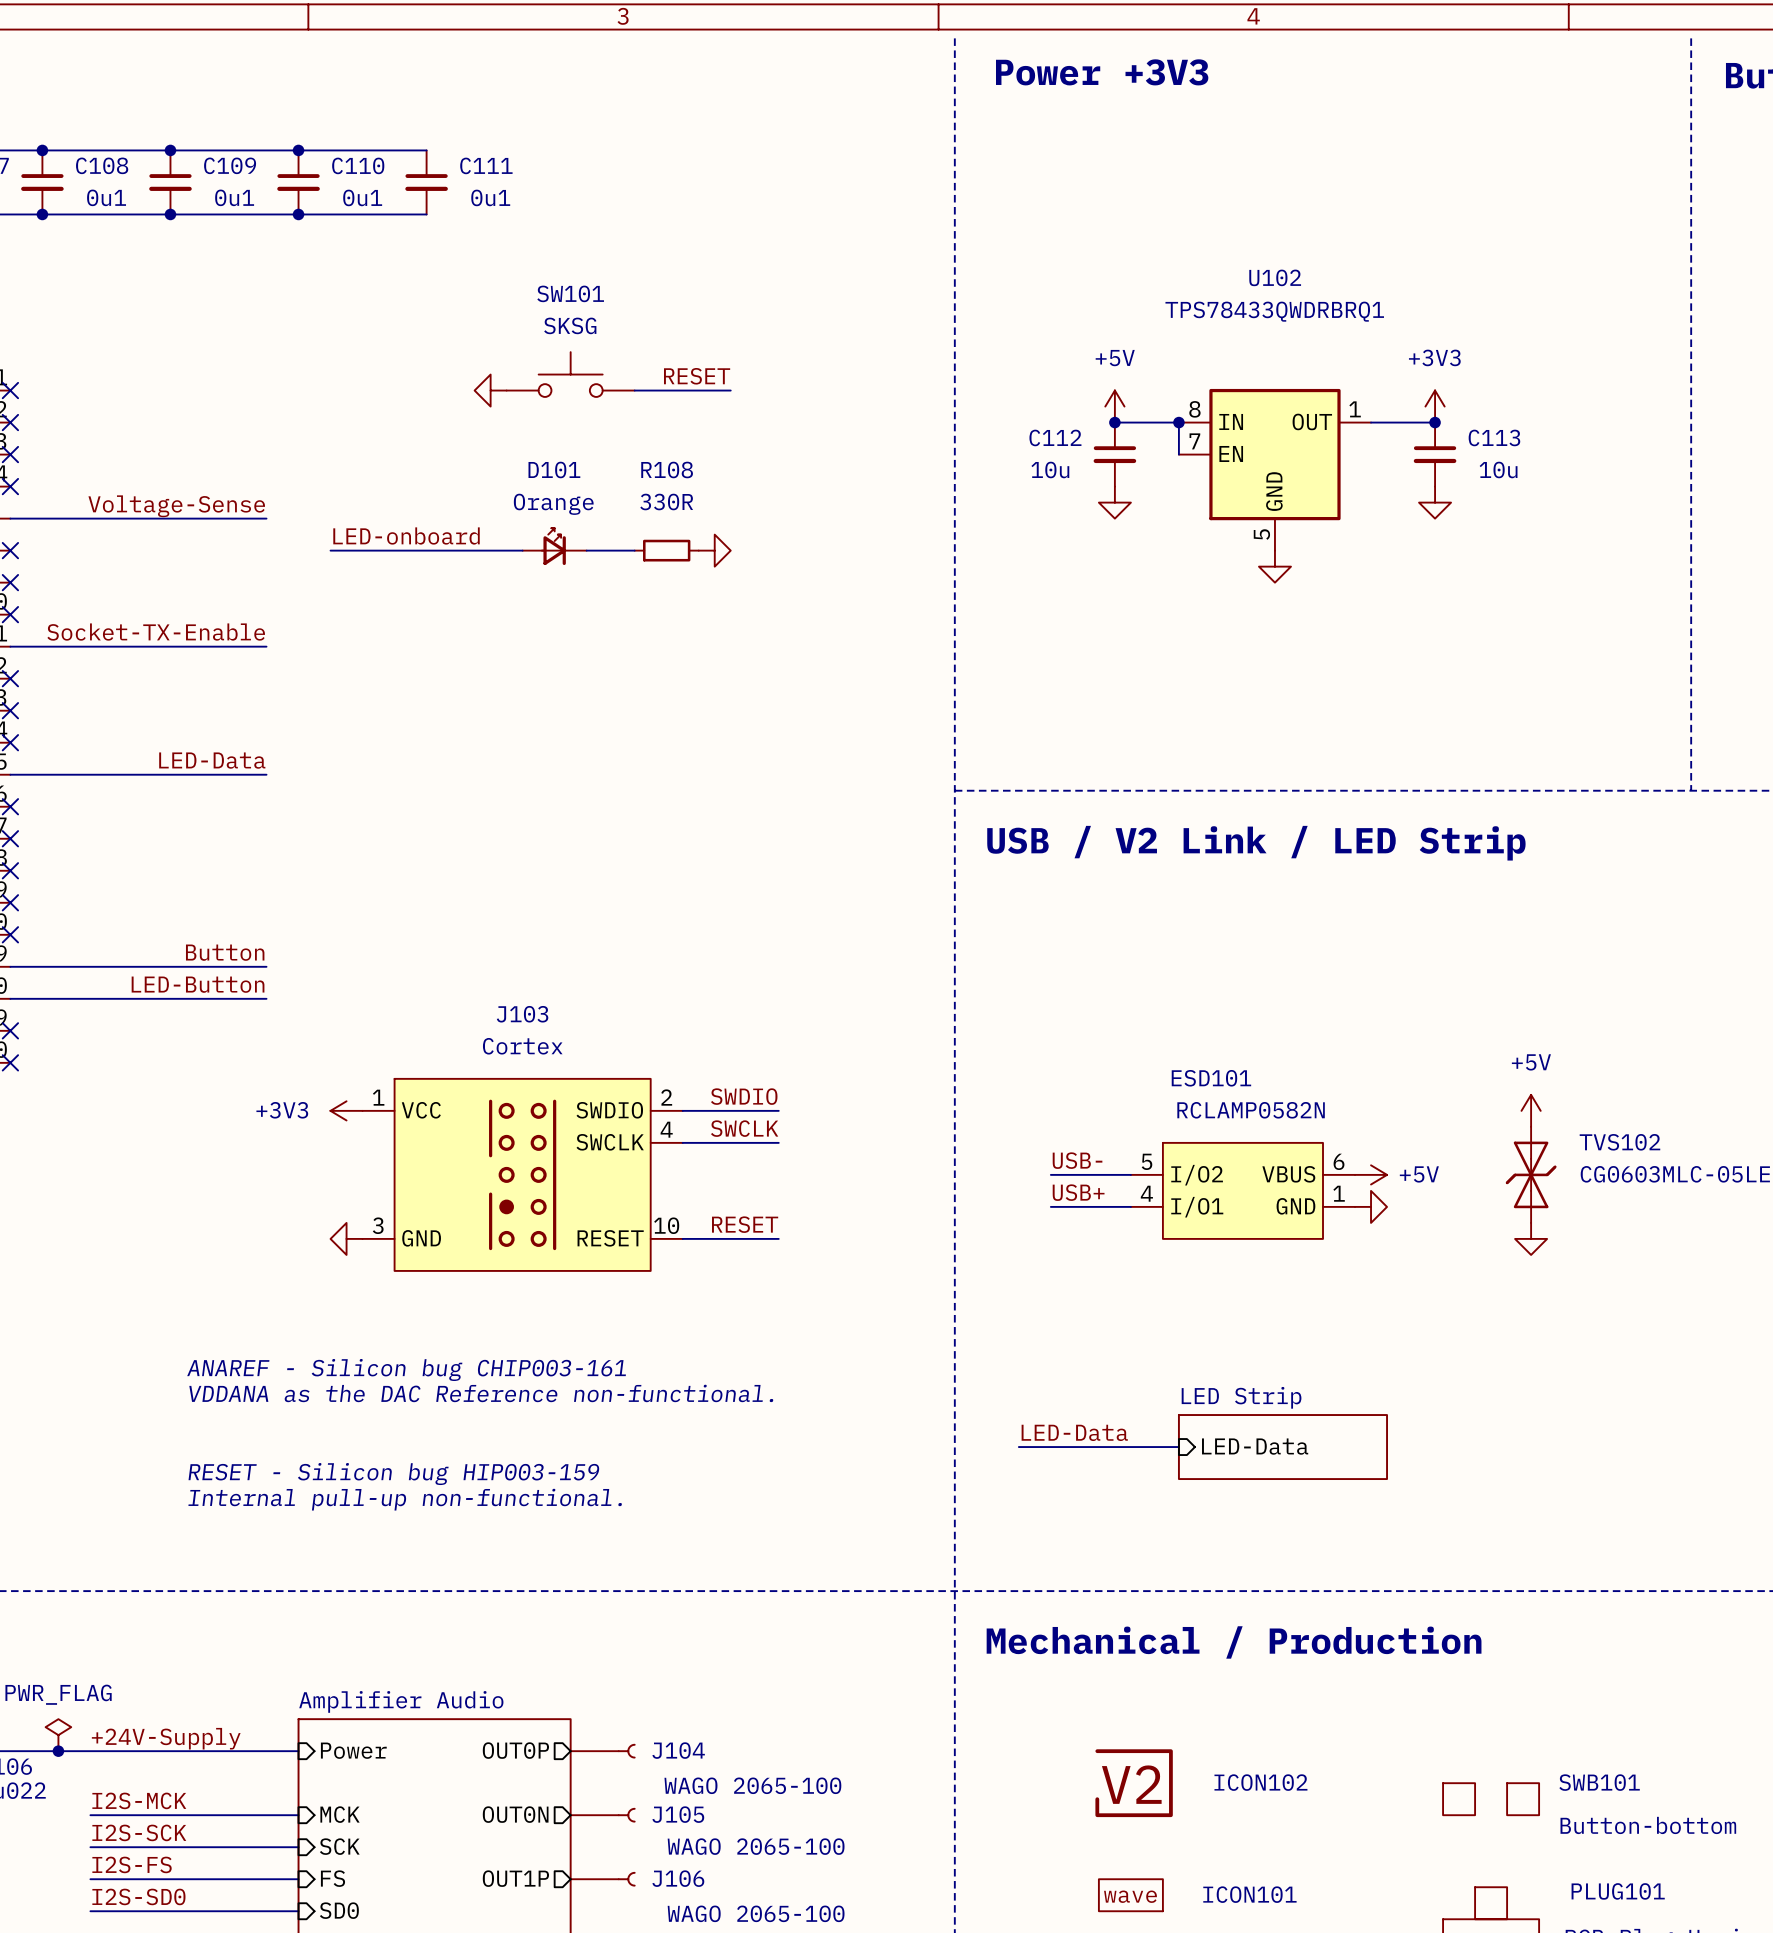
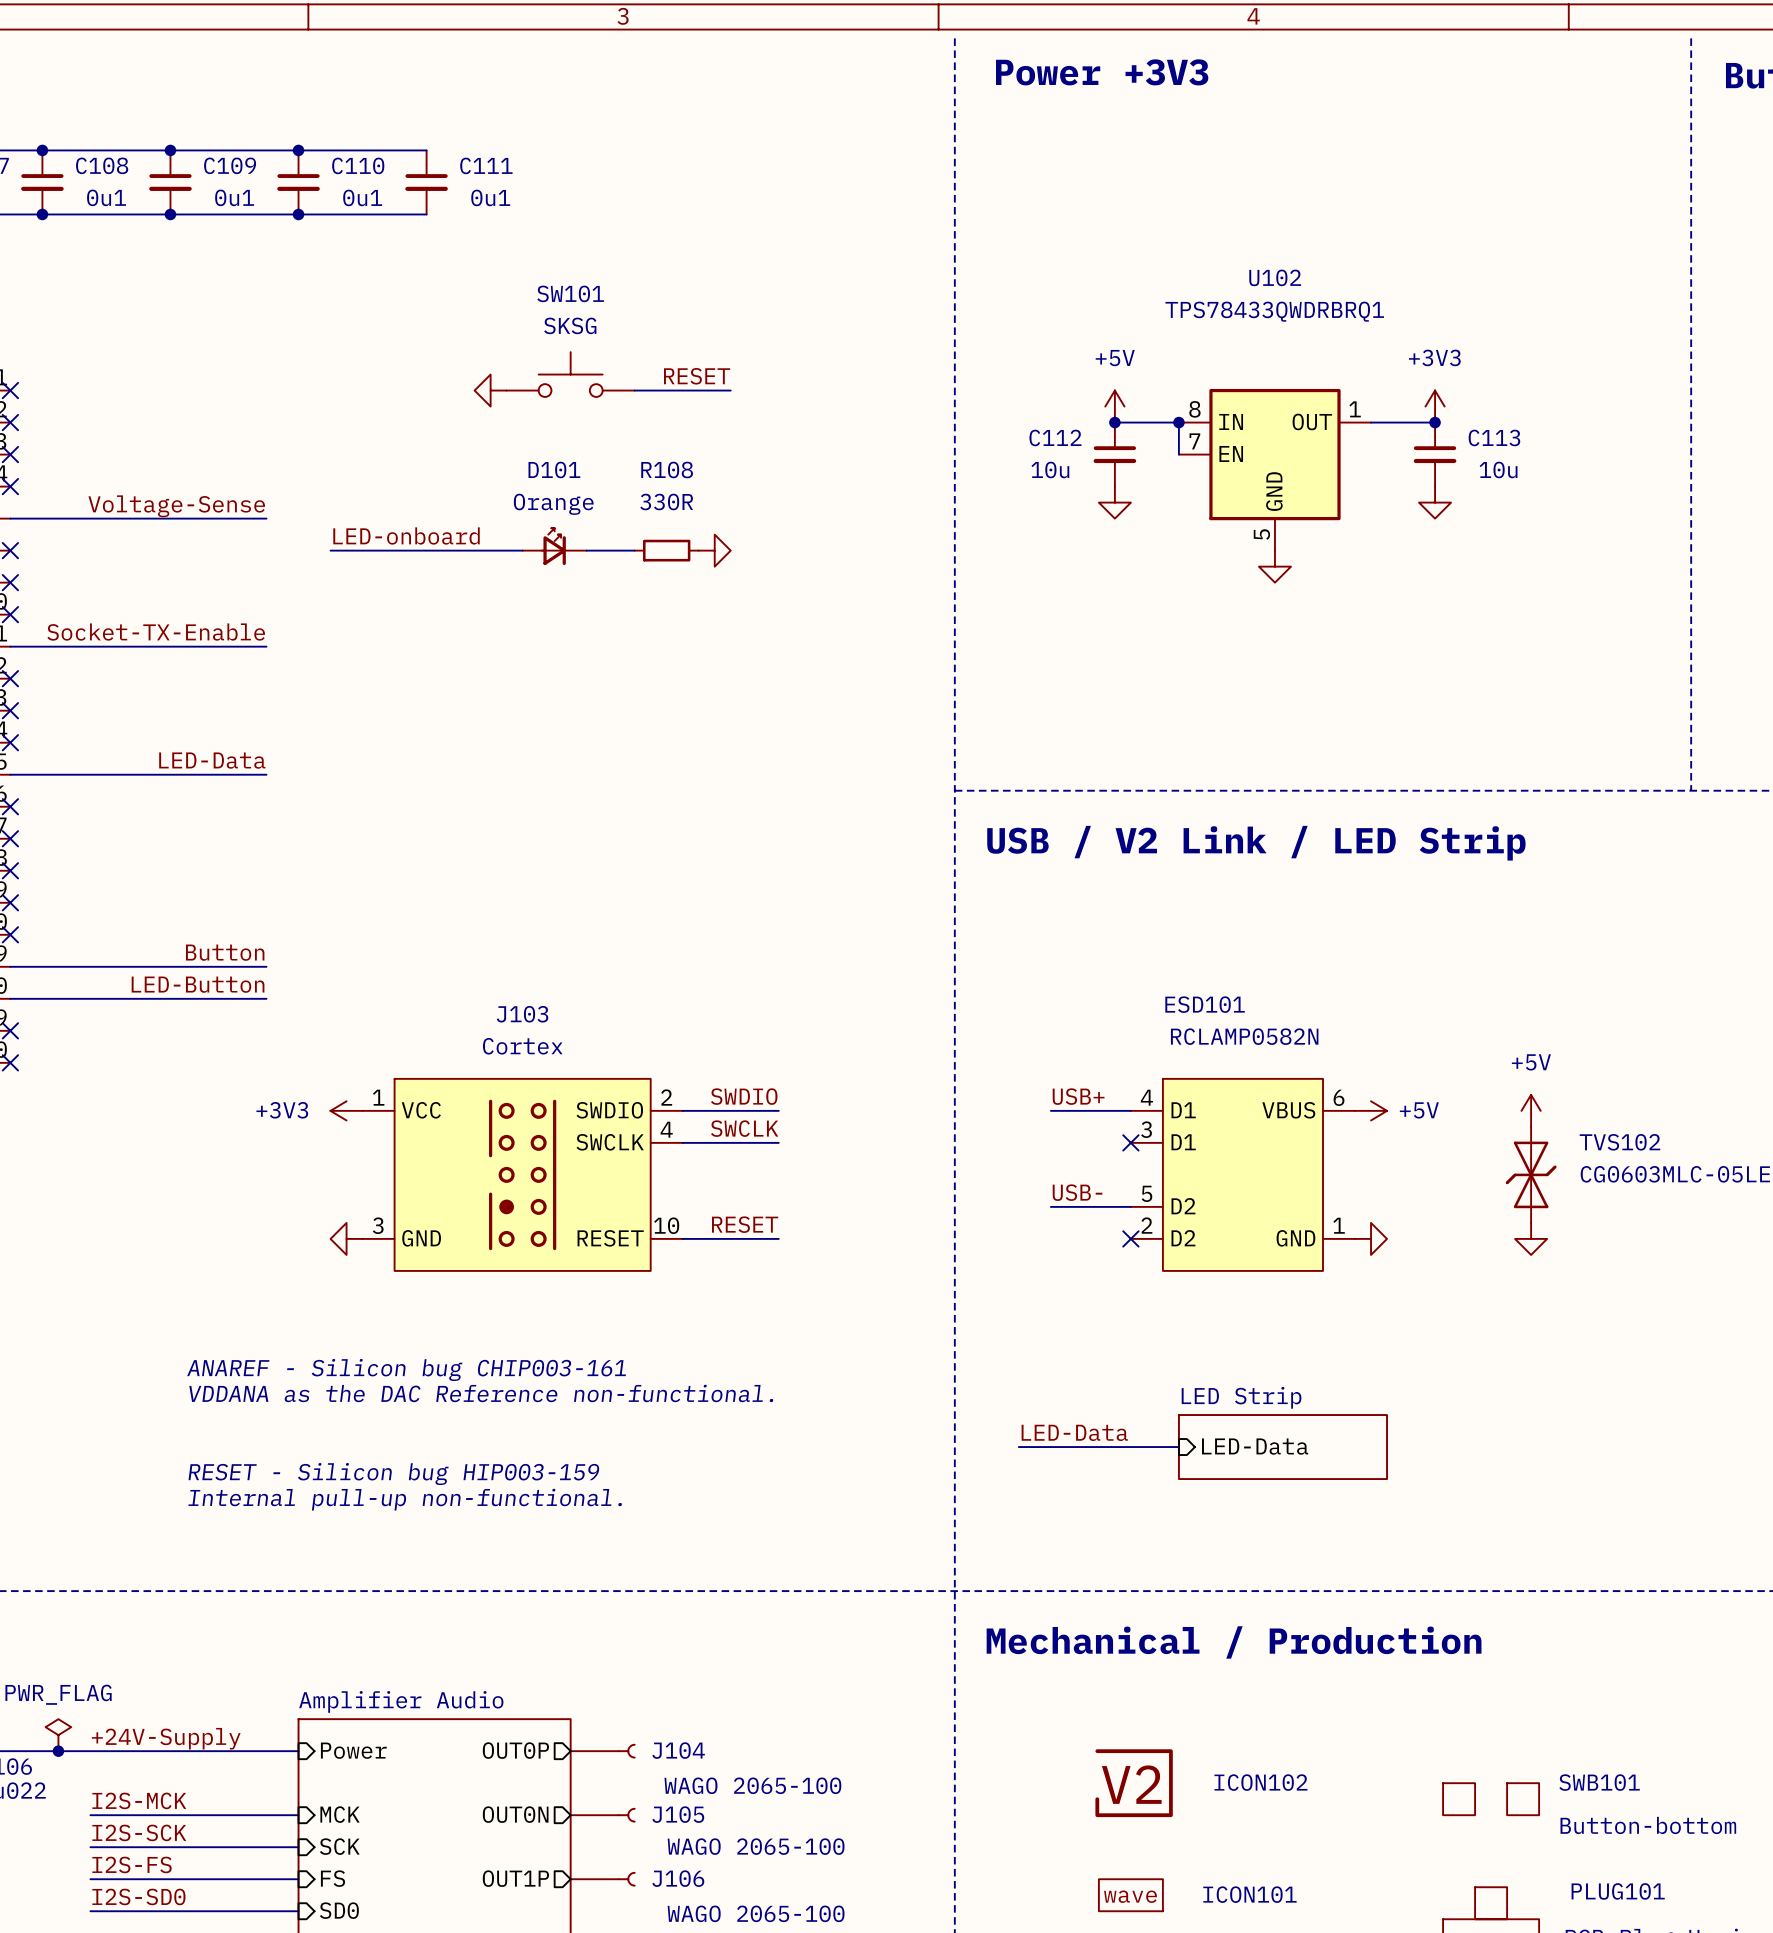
ESD101 name position: ESD101 (1211, 1078) -> ESD101 (1205, 1004)
label: none -> USB+ (1078, 1096)
ESD101 value position: RCLAMP0582N (1251, 1110) -> RCLAMP0582N (1244, 1036)
ESD101 symbol: [1130, 1142, 1356, 1239] -> [1130, 1078, 1356, 1271]
no-connect mark: none -> (1130, 1142)
label: USB- (1077, 1160) -> none
wire: (1050, 1174) (1130, 1174) -> (1050, 1110) (1130, 1110)
power symbol position: +5V (1371, 1174) -> +5V (1371, 1110)
label: USB+ (1078, 1192) -> USB- (1077, 1192)
power symbol position: (1371, 1206) -> (1371, 1238)
no-connect mark: none -> (1130, 1238)

